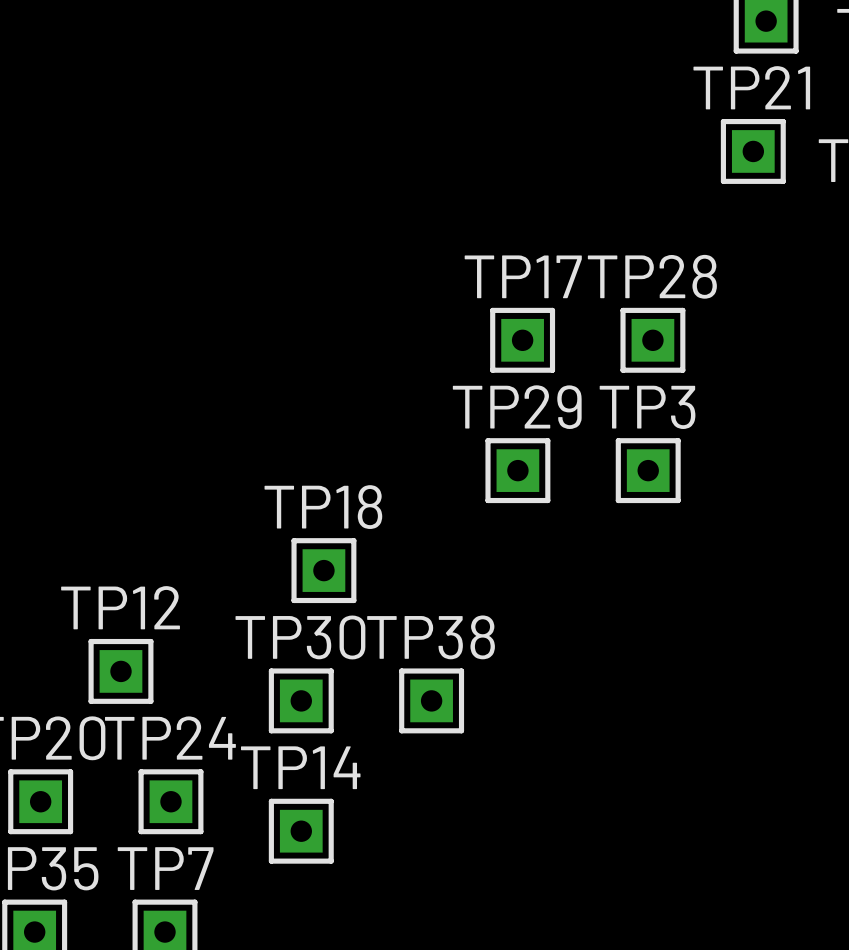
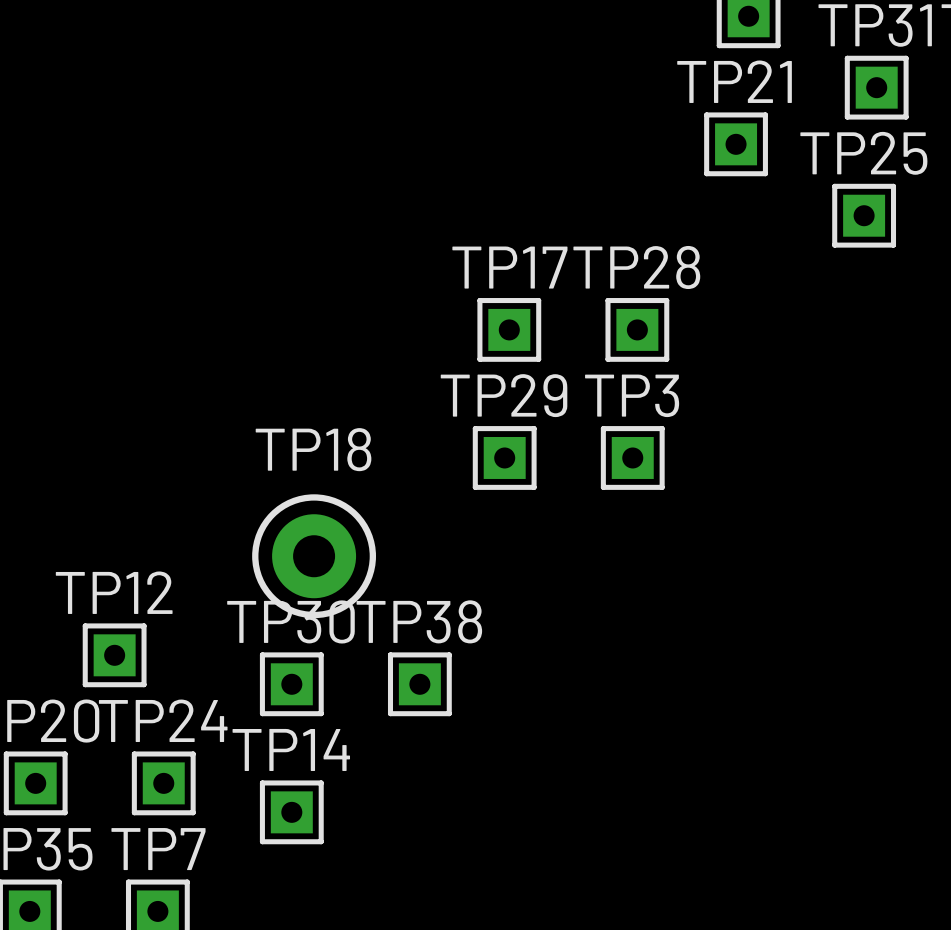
TP18 name position: TP18 (323, 507) -> TP18 (313, 449)
TP18 footprint: [291, 538, 357, 604] -> [252, 494, 377, 619]

